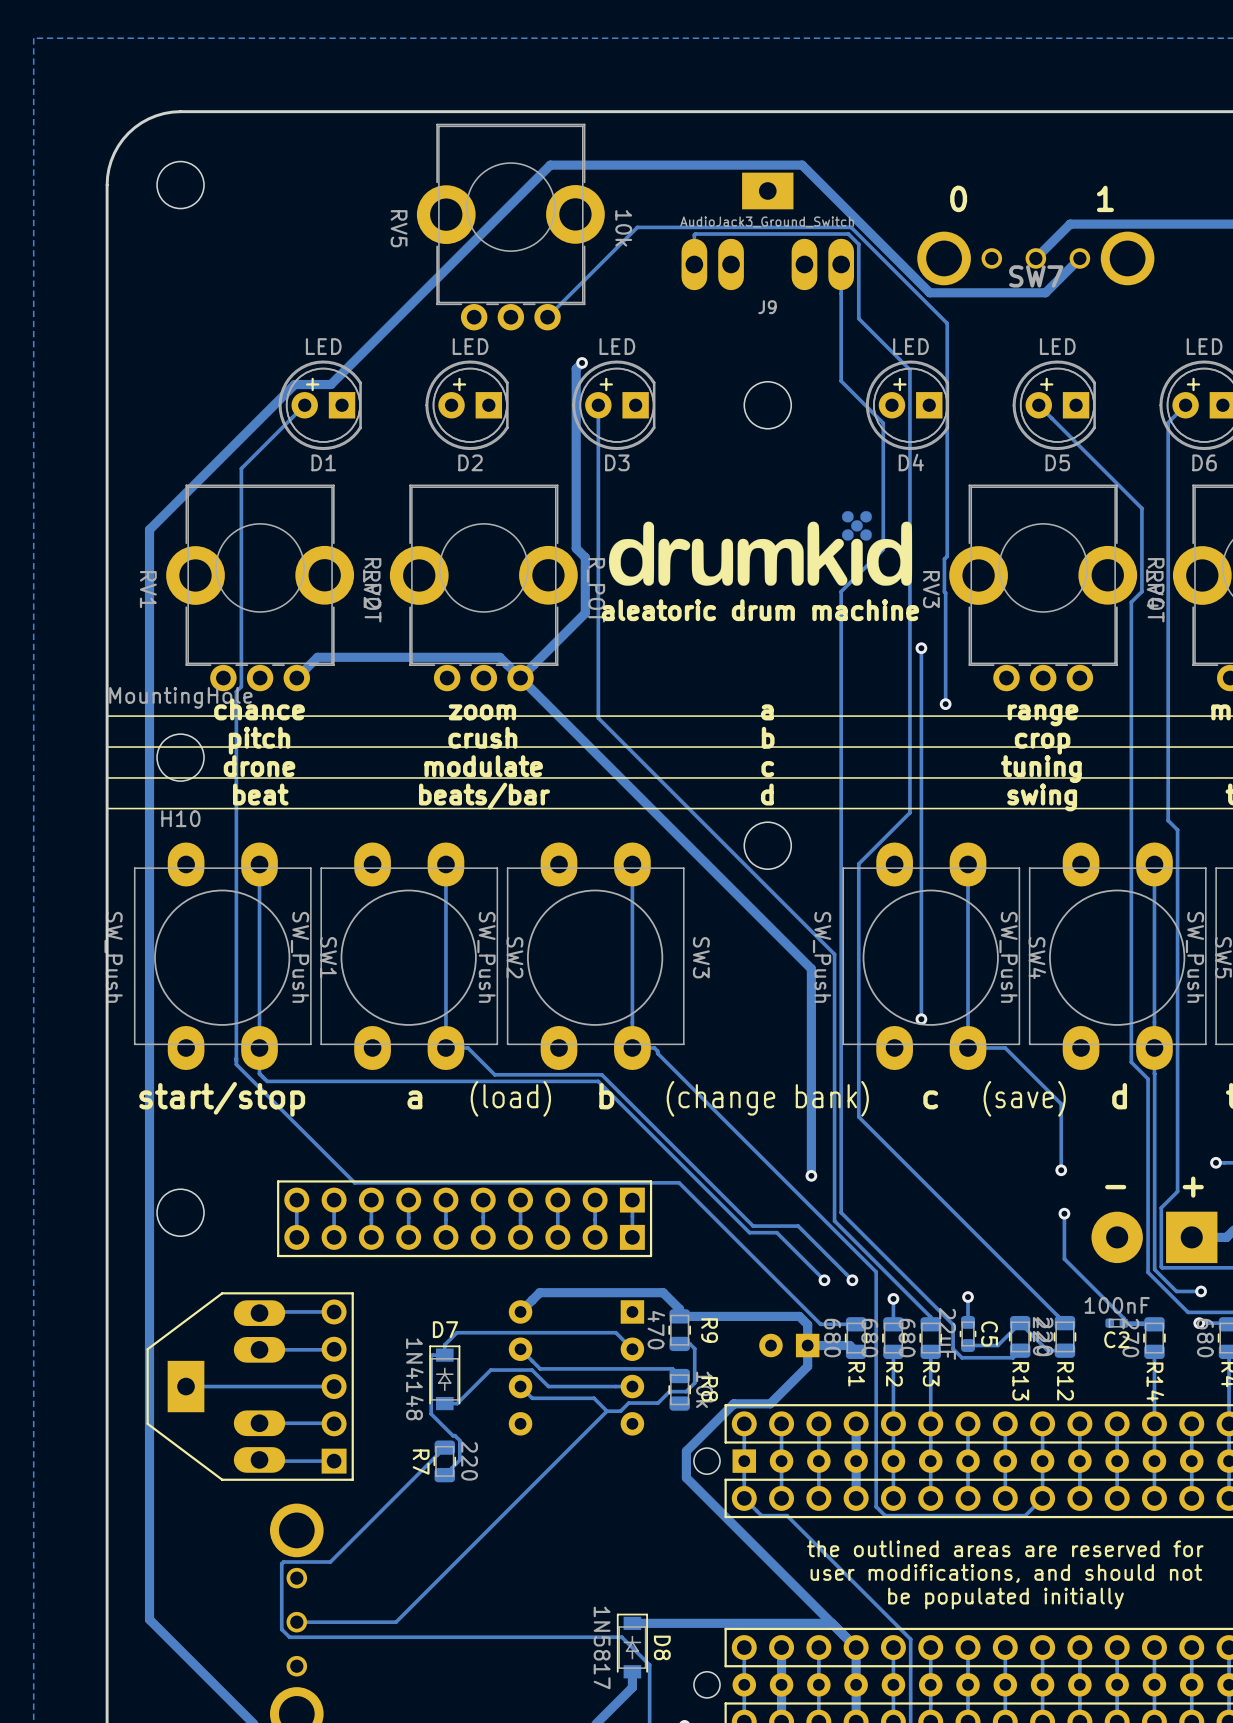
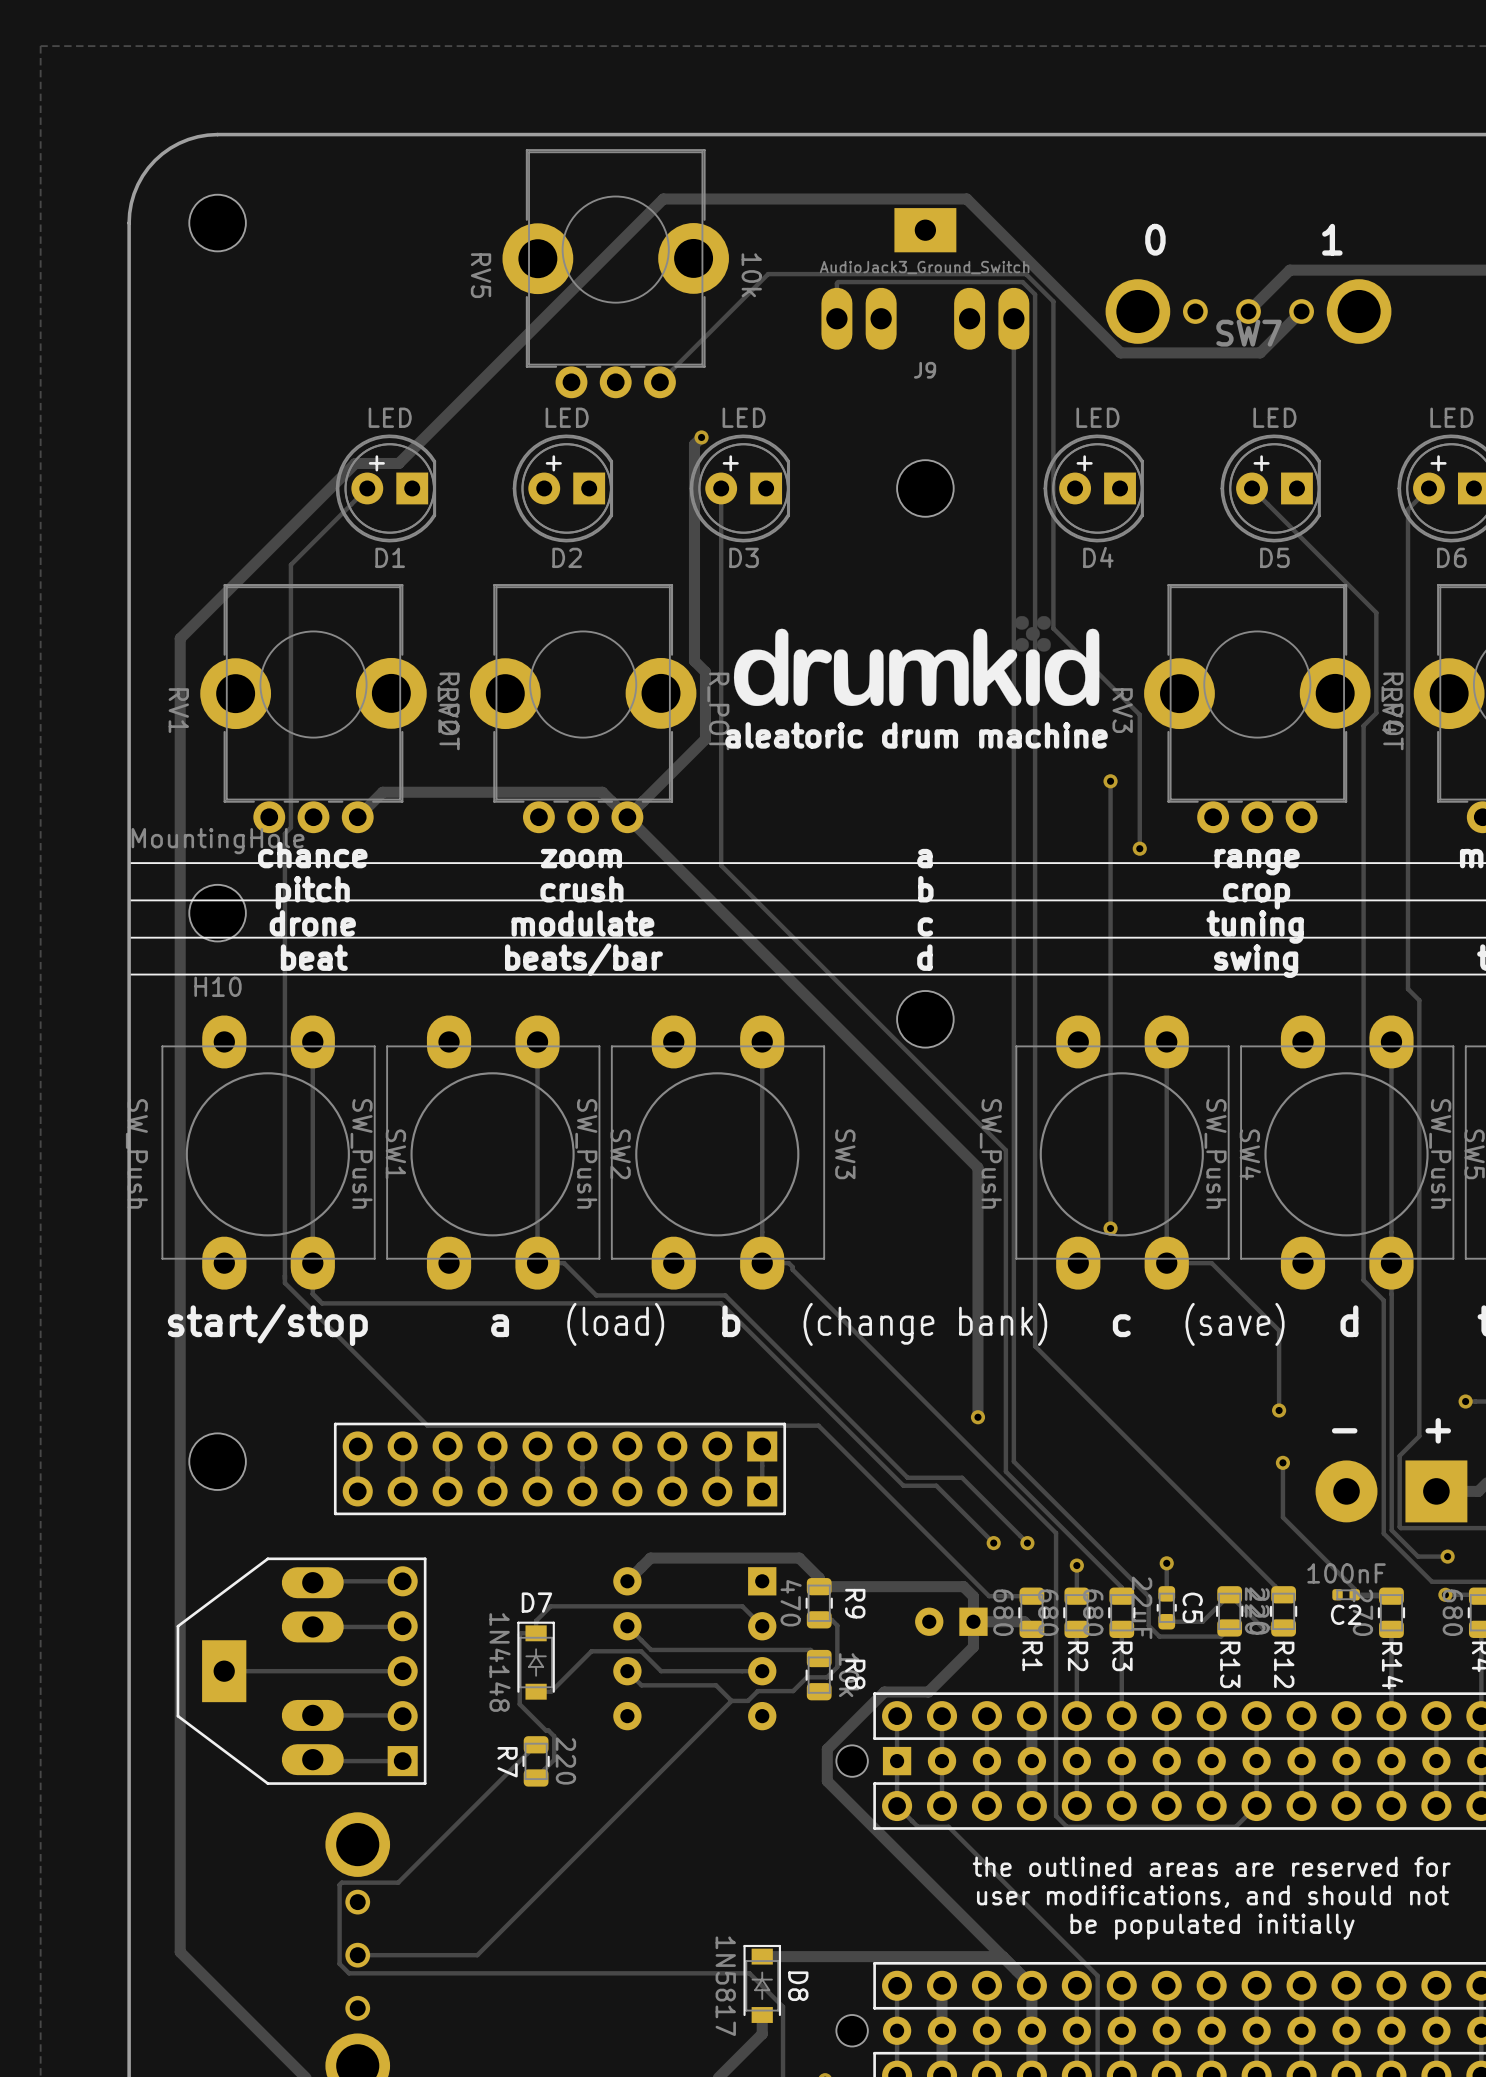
track: (873, 250) (947, 323) (947, 556) (944, 559) (944, 591) -> (1053, 301) (1053, 628) (1138, 713)
track: (858, 318) (909, 369) (909, 812) (858, 863) -> (1035, 384) (1035, 1041)
track: (841, 381) (883, 423) (883, 549) (841, 591) -> (1013, 459) (1013, 713)

